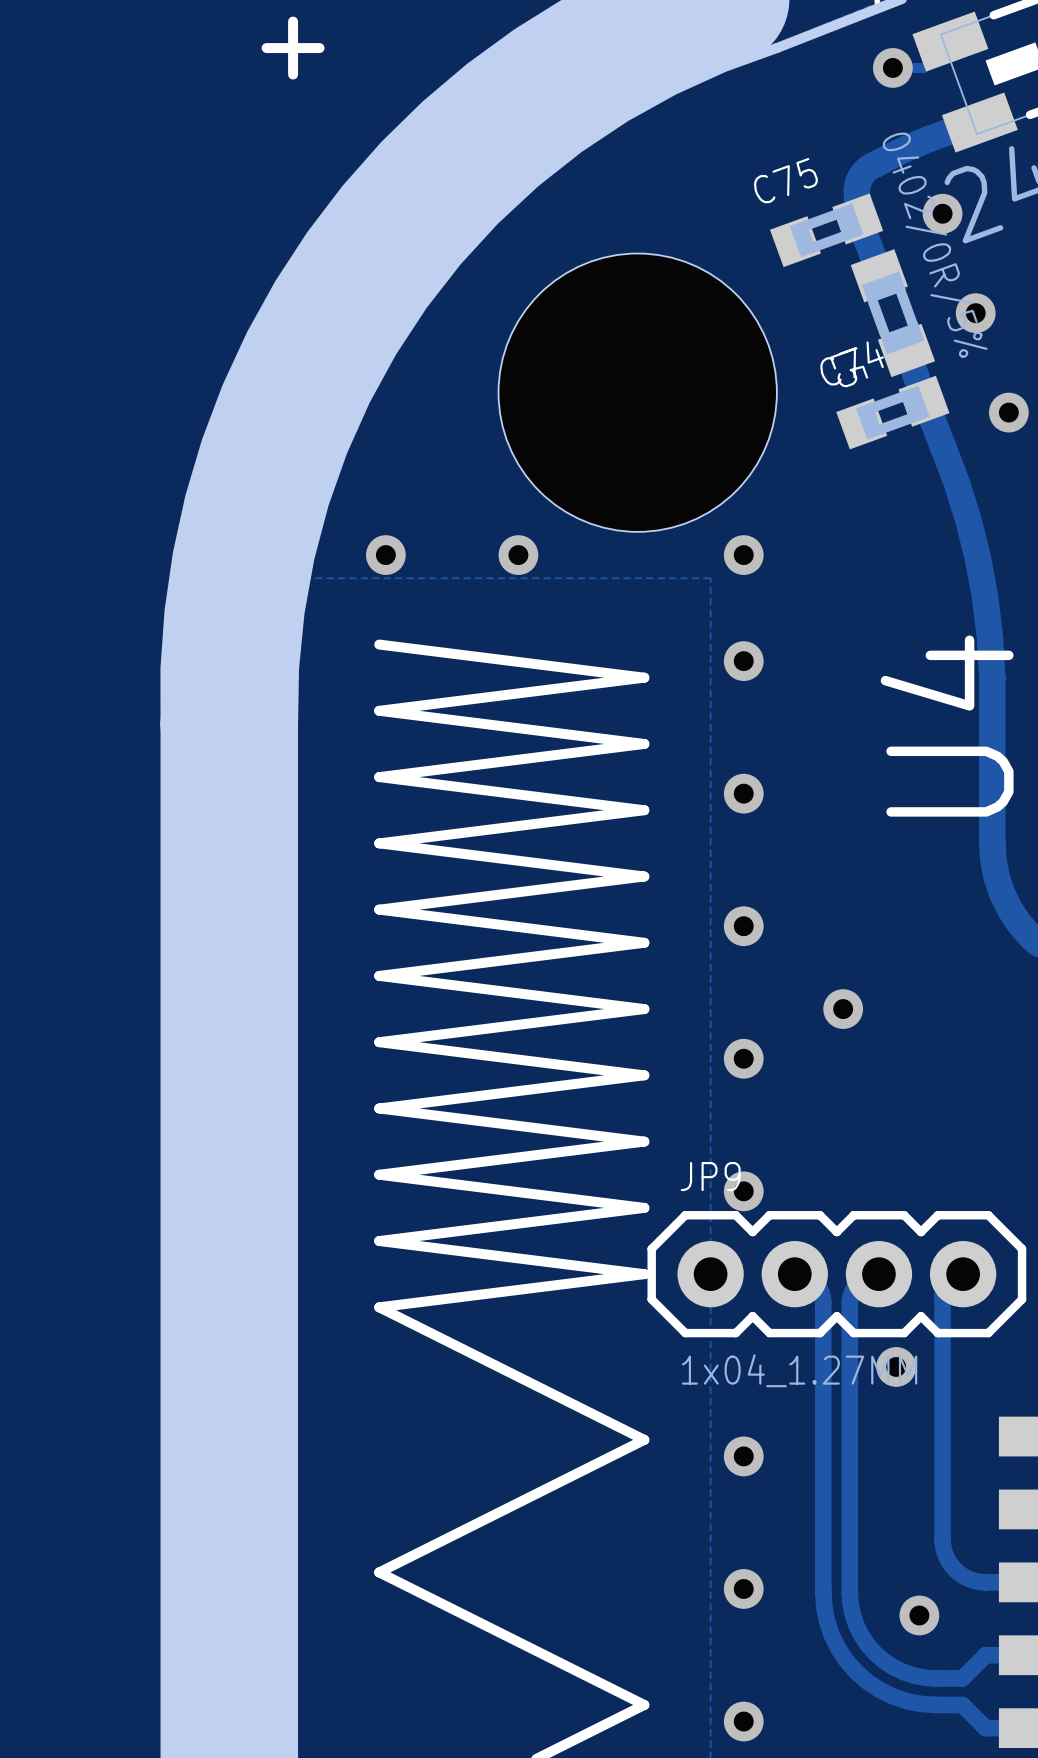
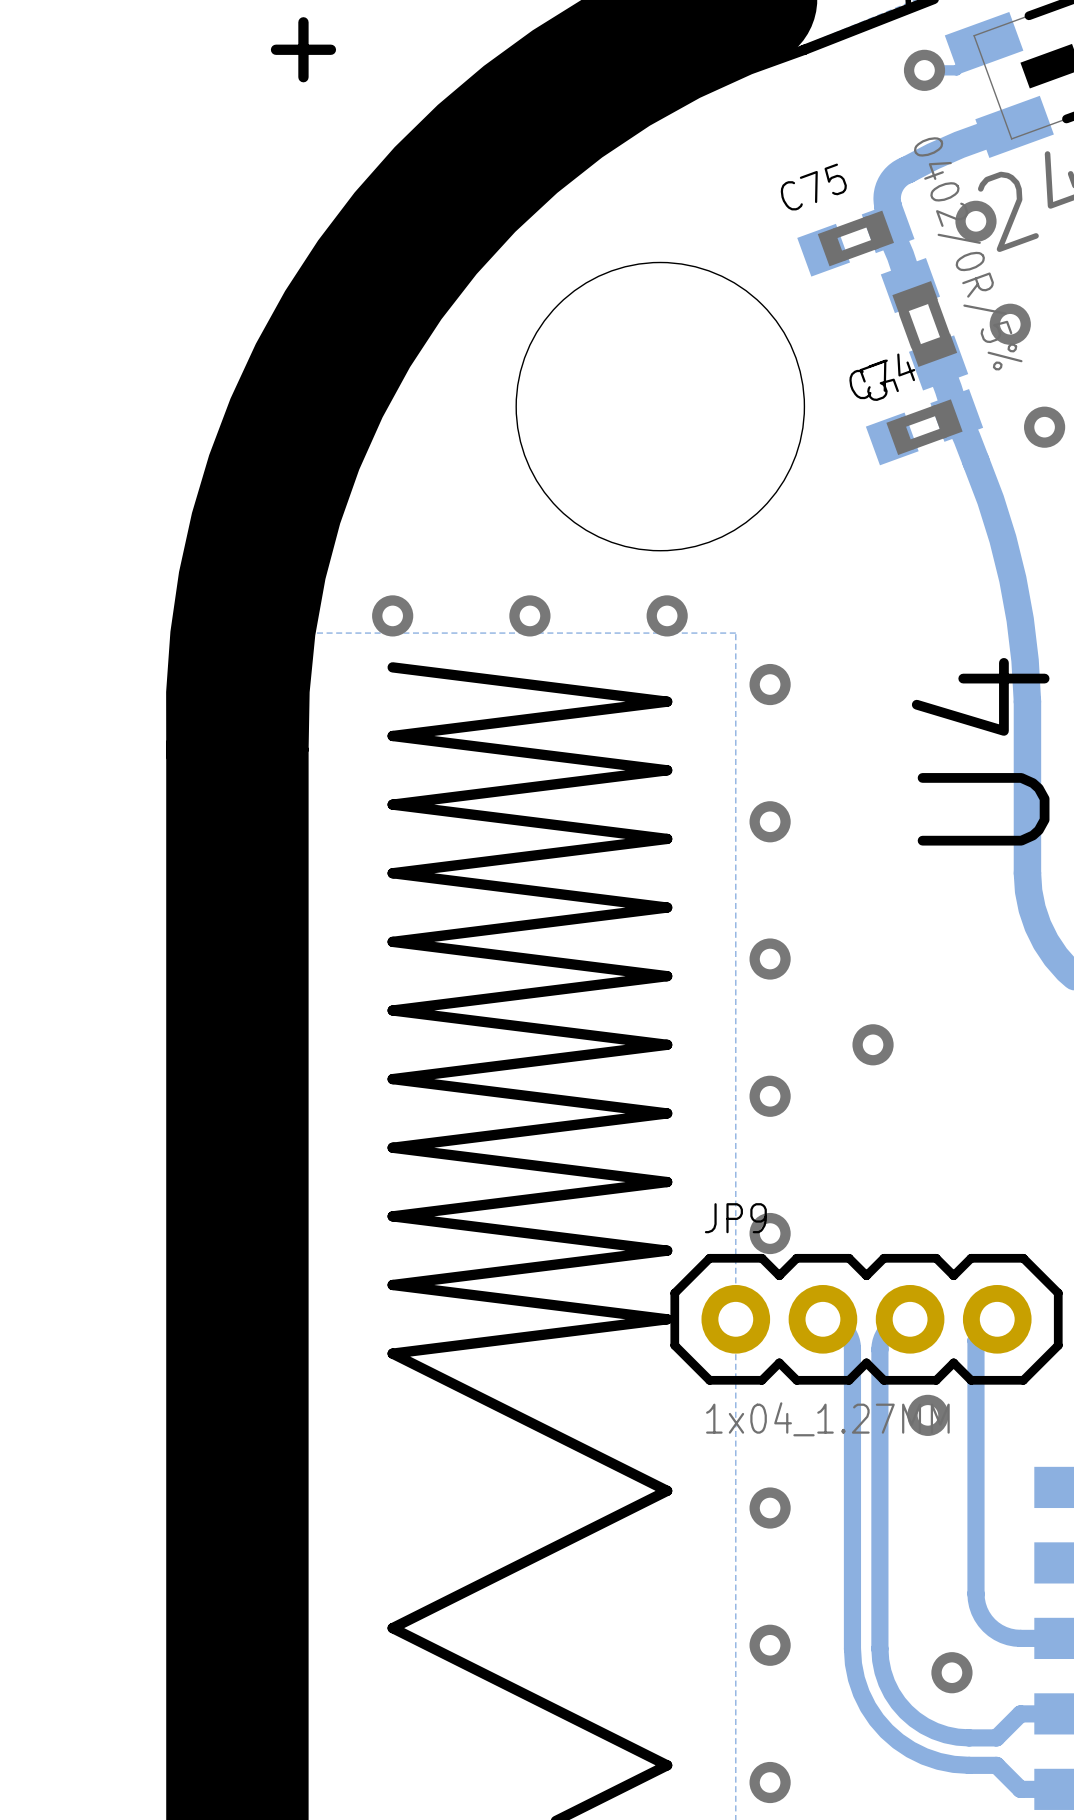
via position: (385, 555) -> (392, 615)
via position: (518, 555) -> (529, 615)
via: (743, 555) -> none
zone outline: (293, 578) (710, 578) (710, 611) -> (303, 598) (303, 633) (735, 633)
via: none -> (667, 615)

